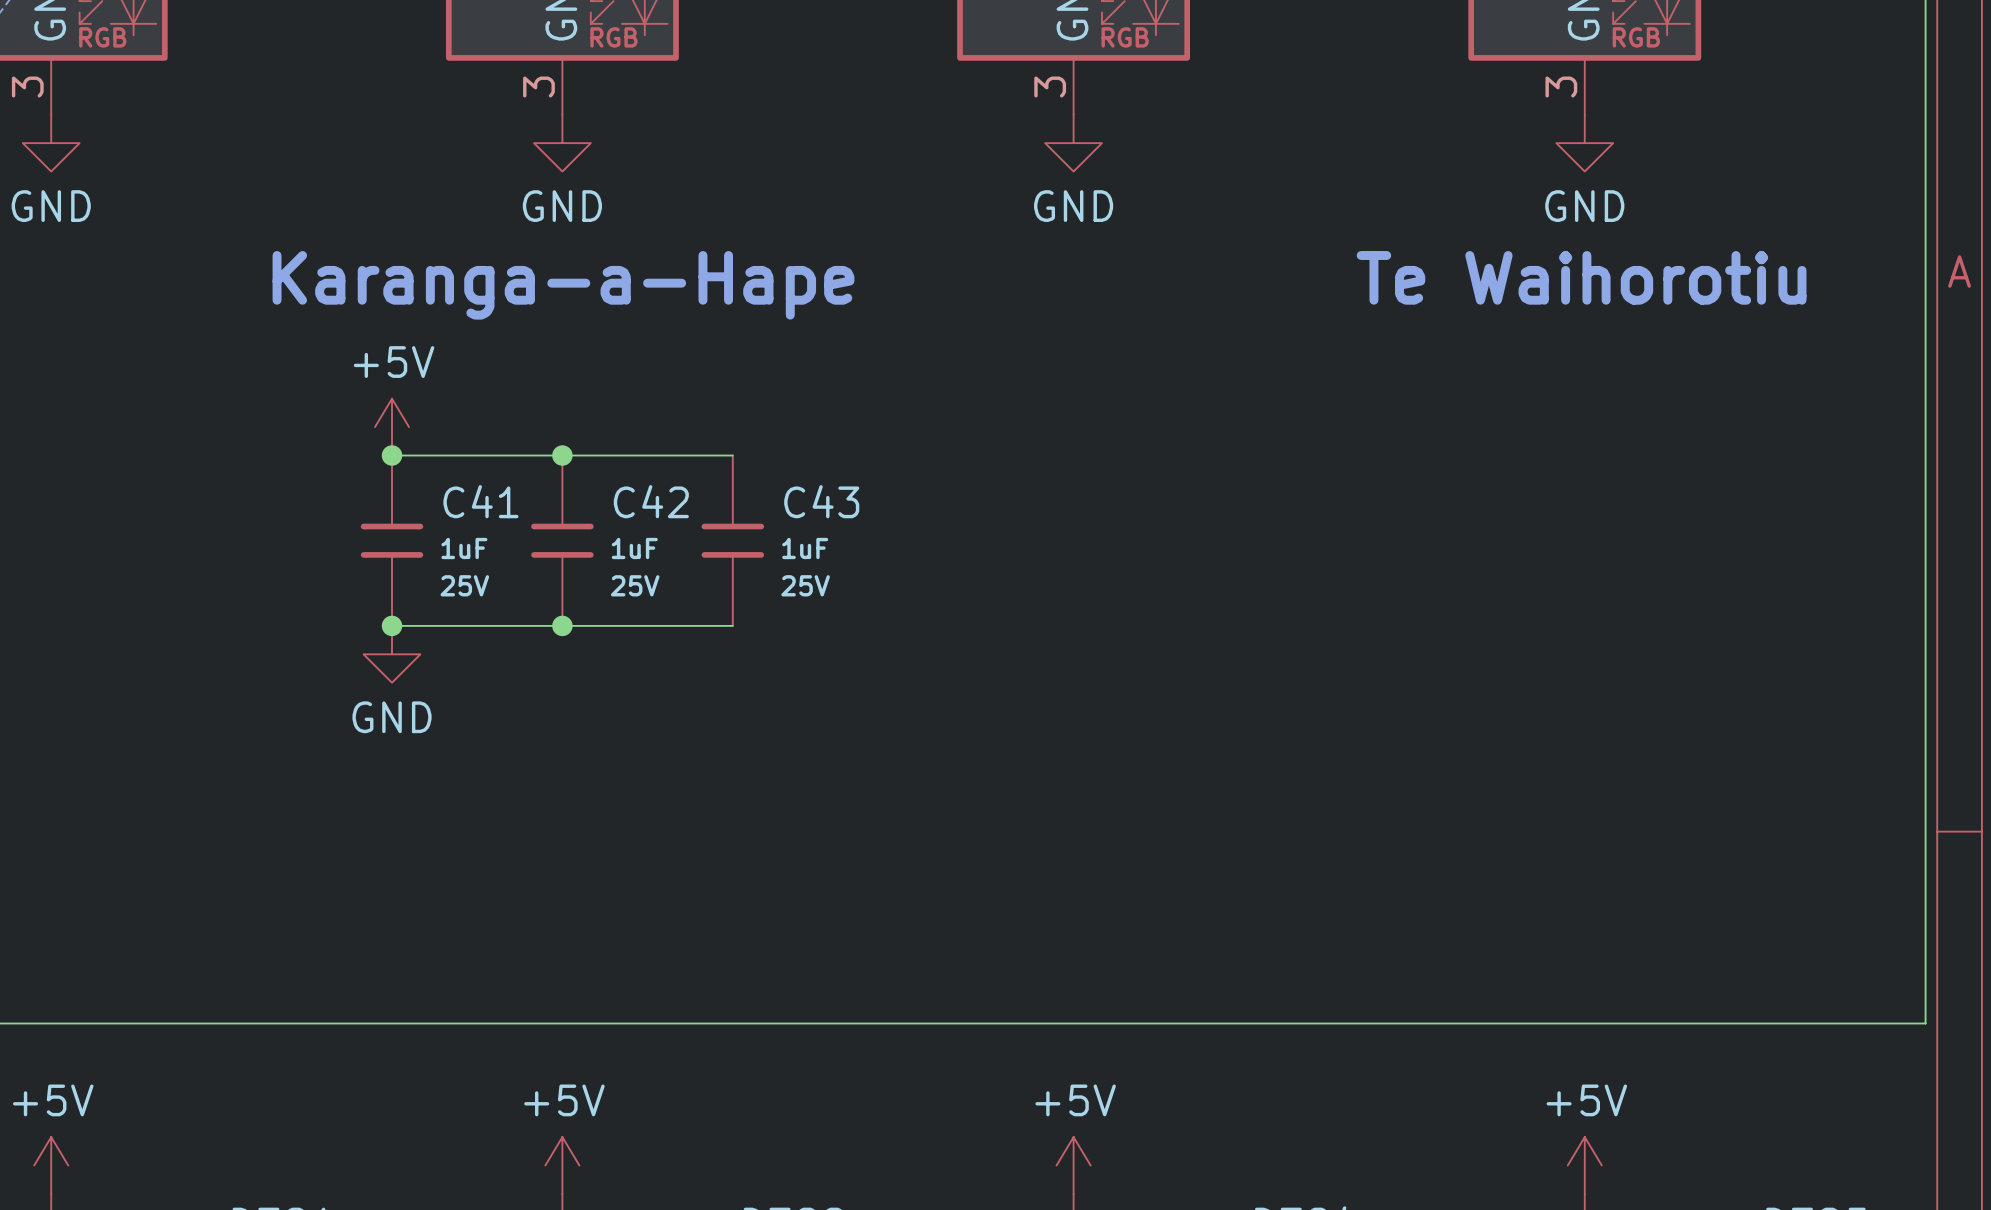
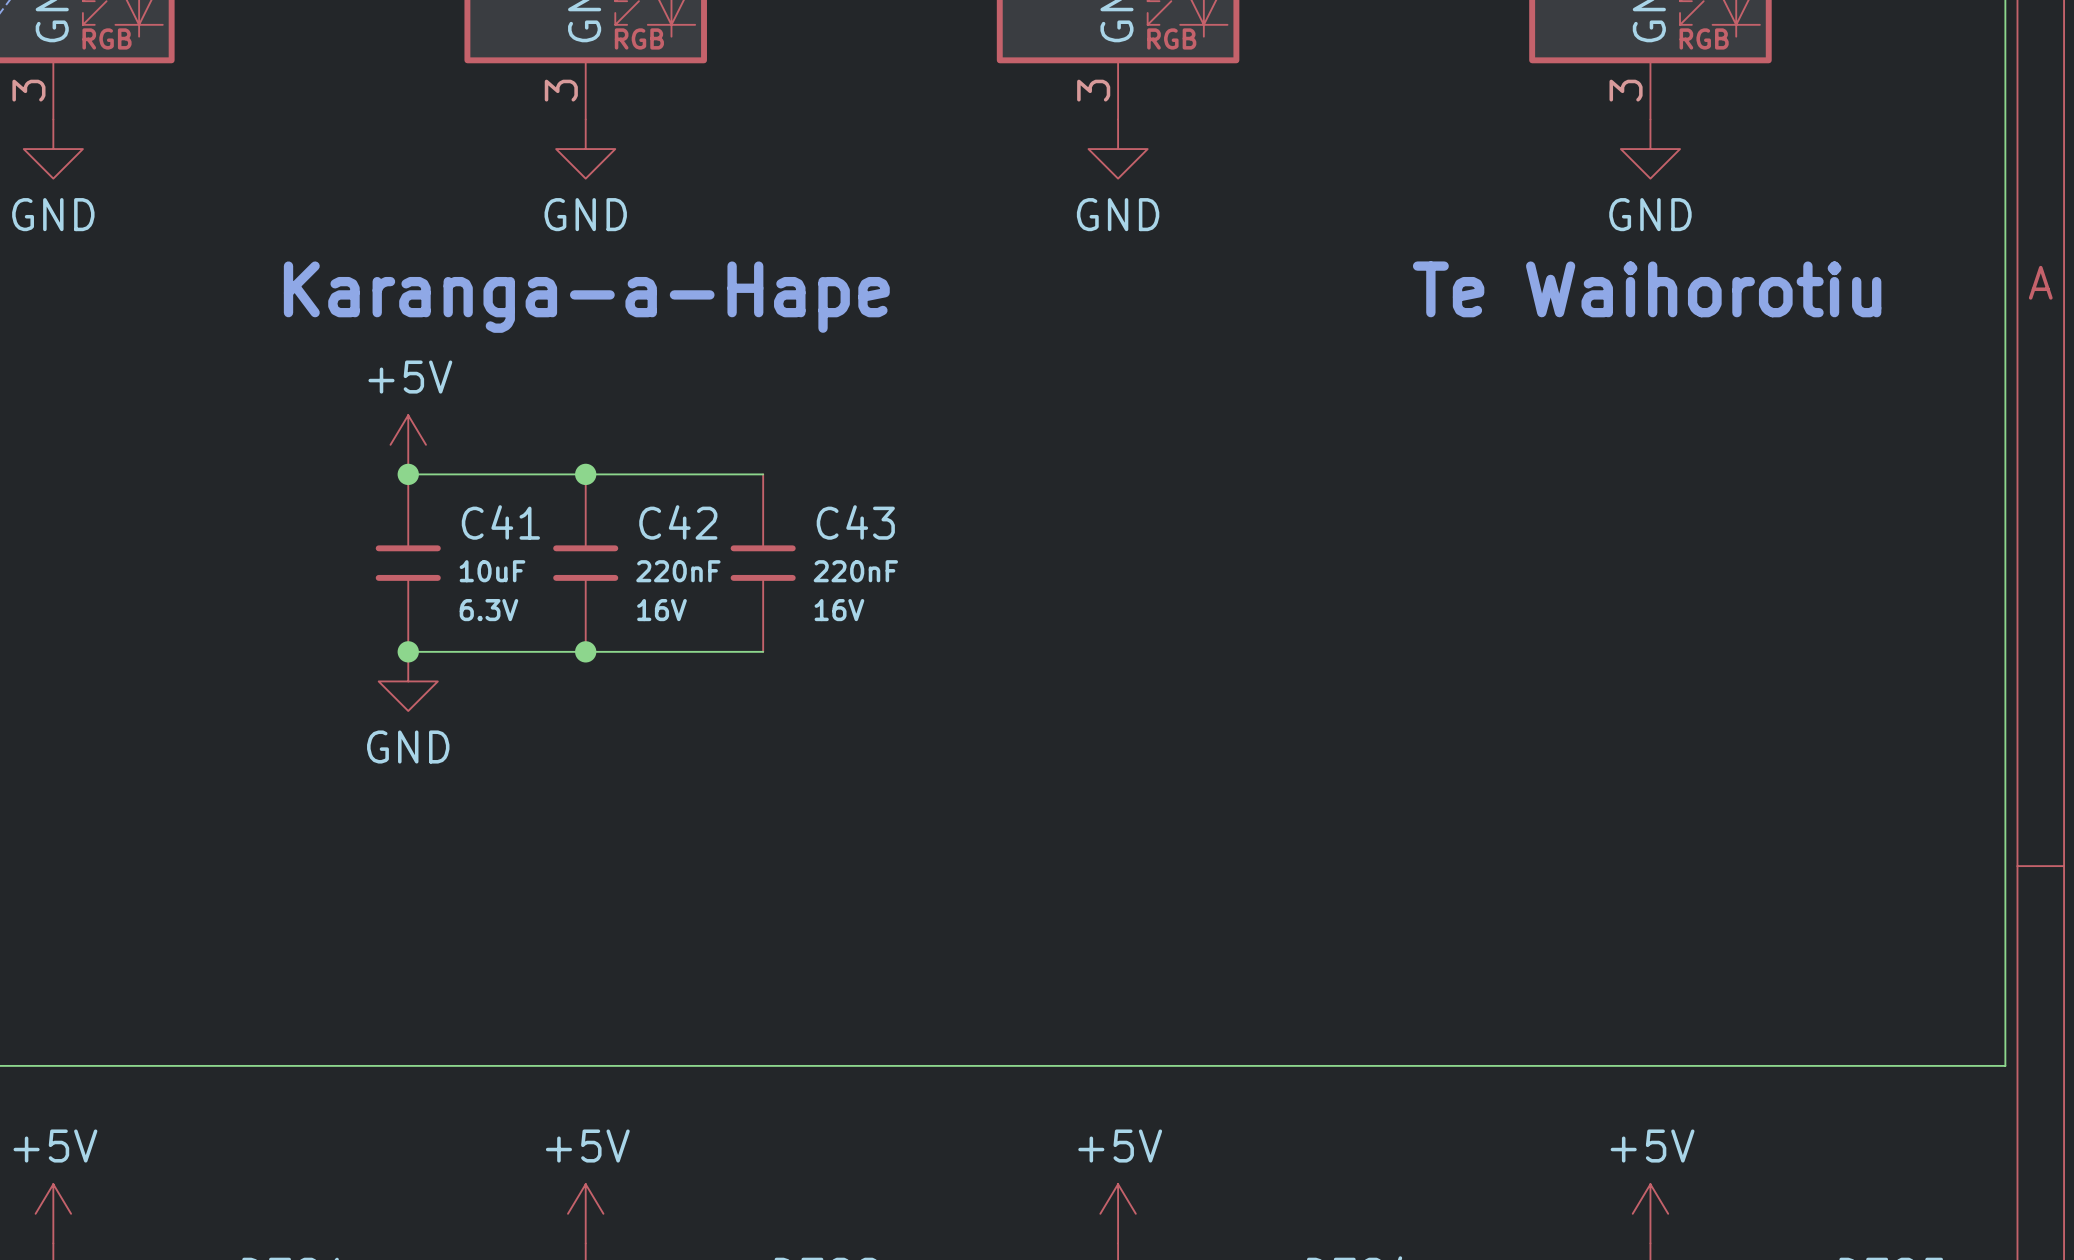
C41 value: 1uF (464, 548) -> 10uF (492, 571)
C42 value: 1uF (634, 548) -> 220nF (678, 571)
C43 value: 1uF (805, 548) -> 220nF (855, 571)
C41 text: 25V (464, 585) -> 6.3V (488, 610)
C42 text: 25V (635, 585) -> 16V (661, 610)
C43 text: 25V (805, 585) -> 16V (839, 610)

